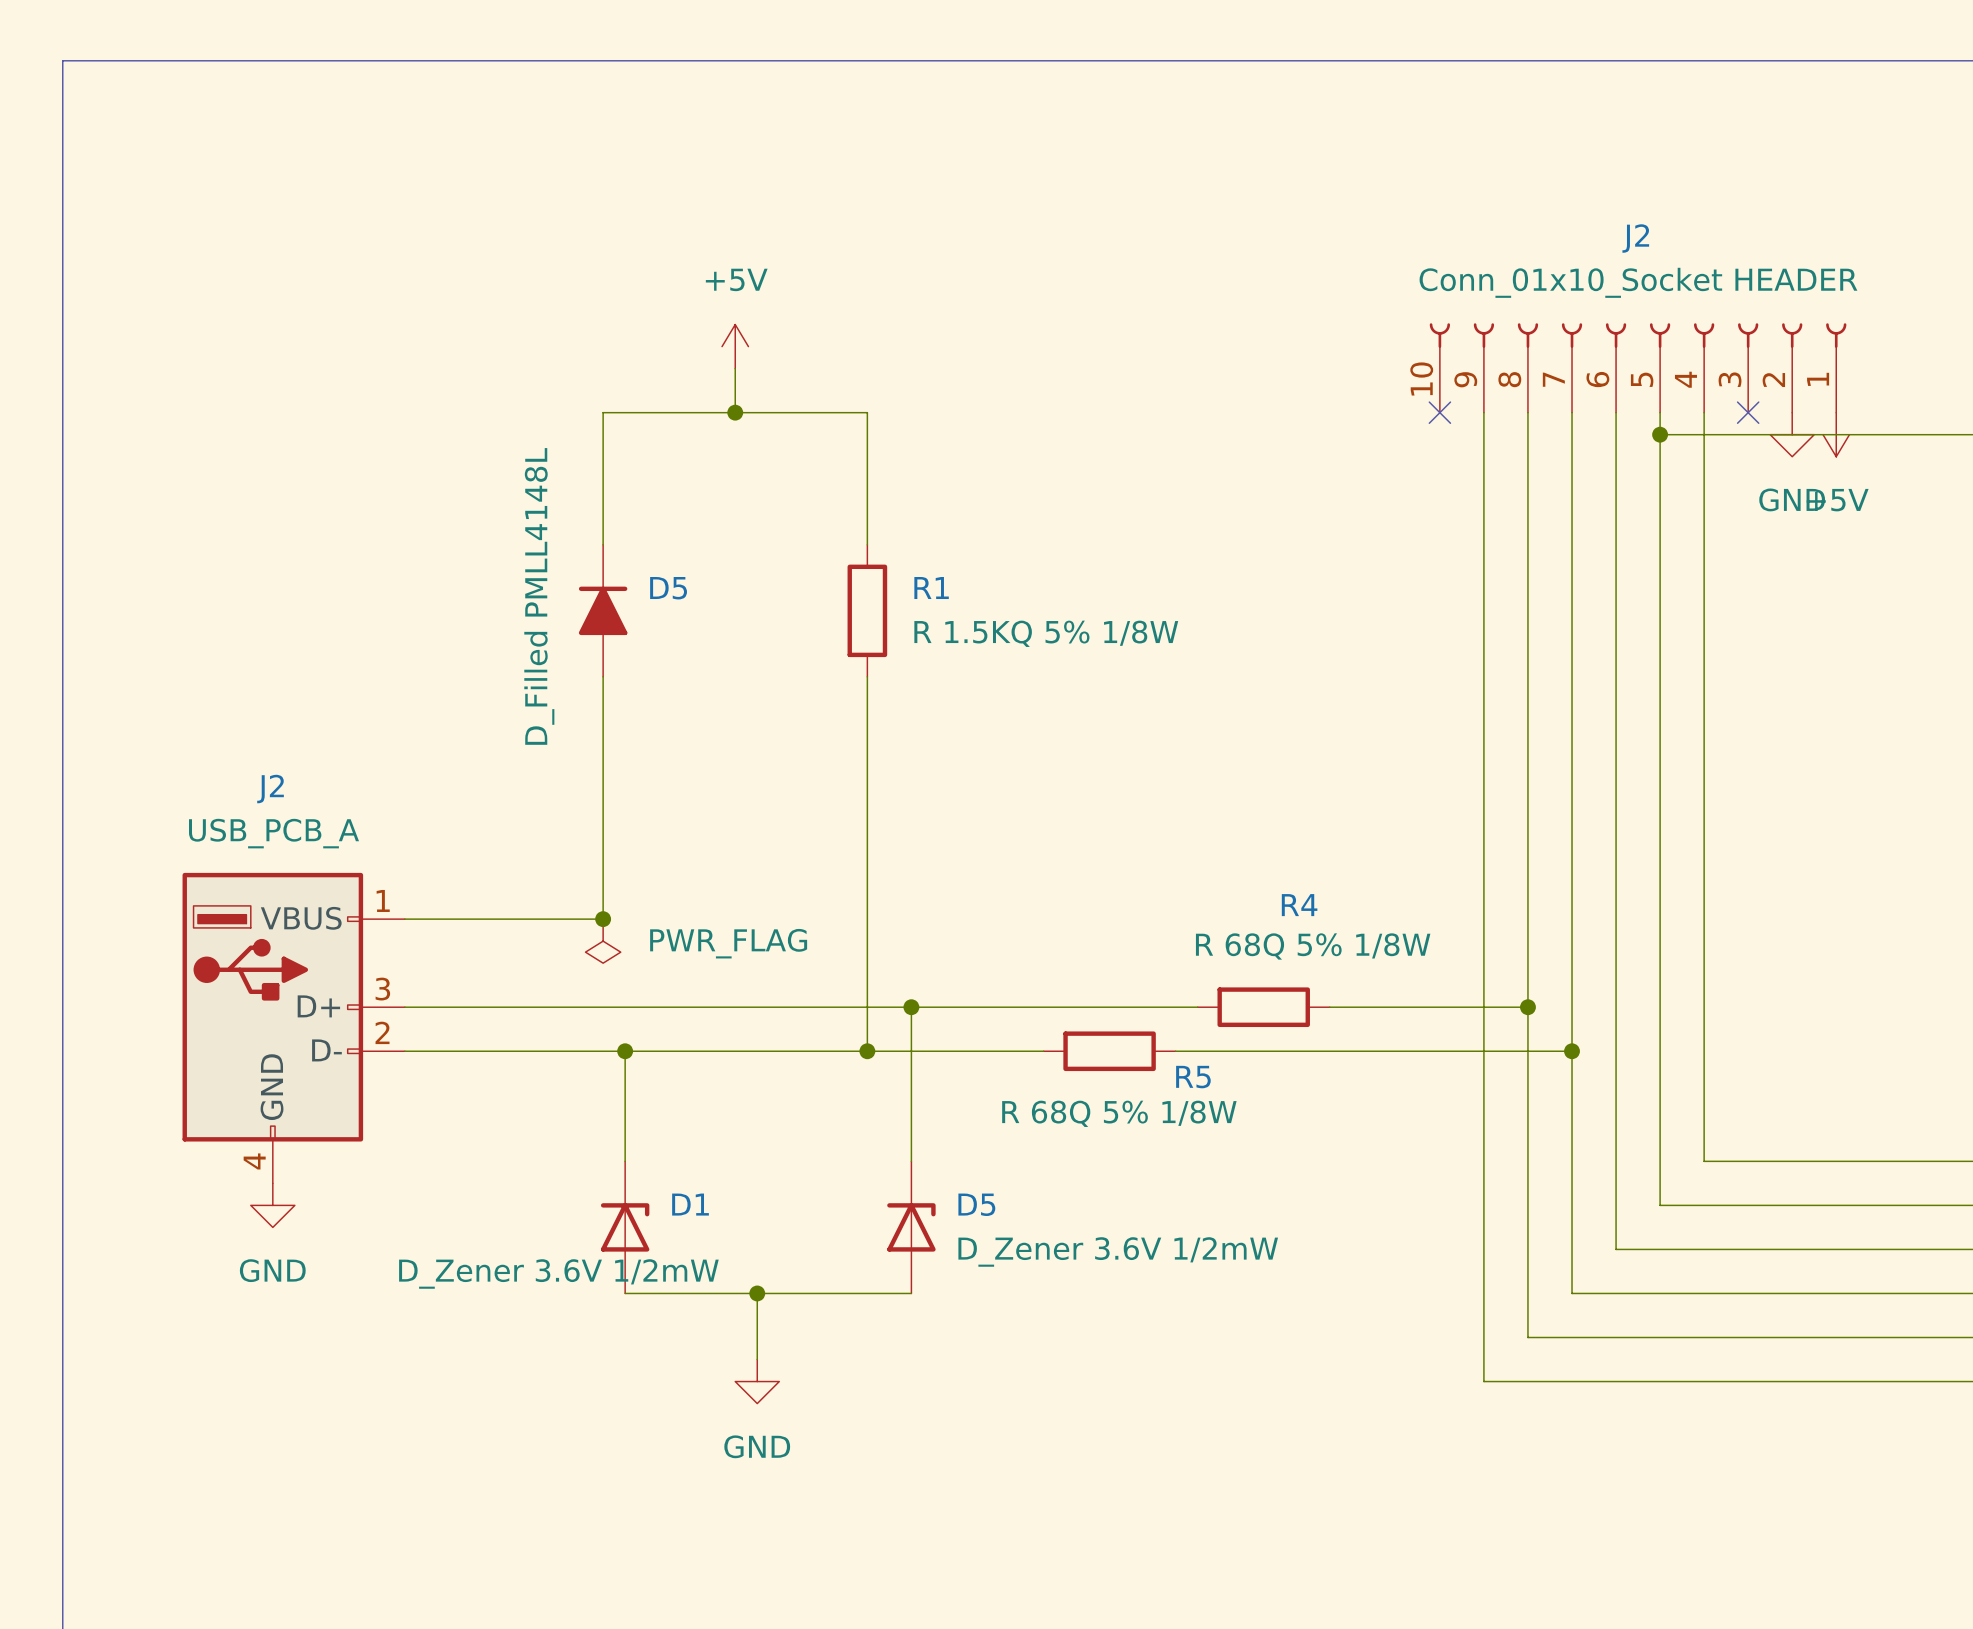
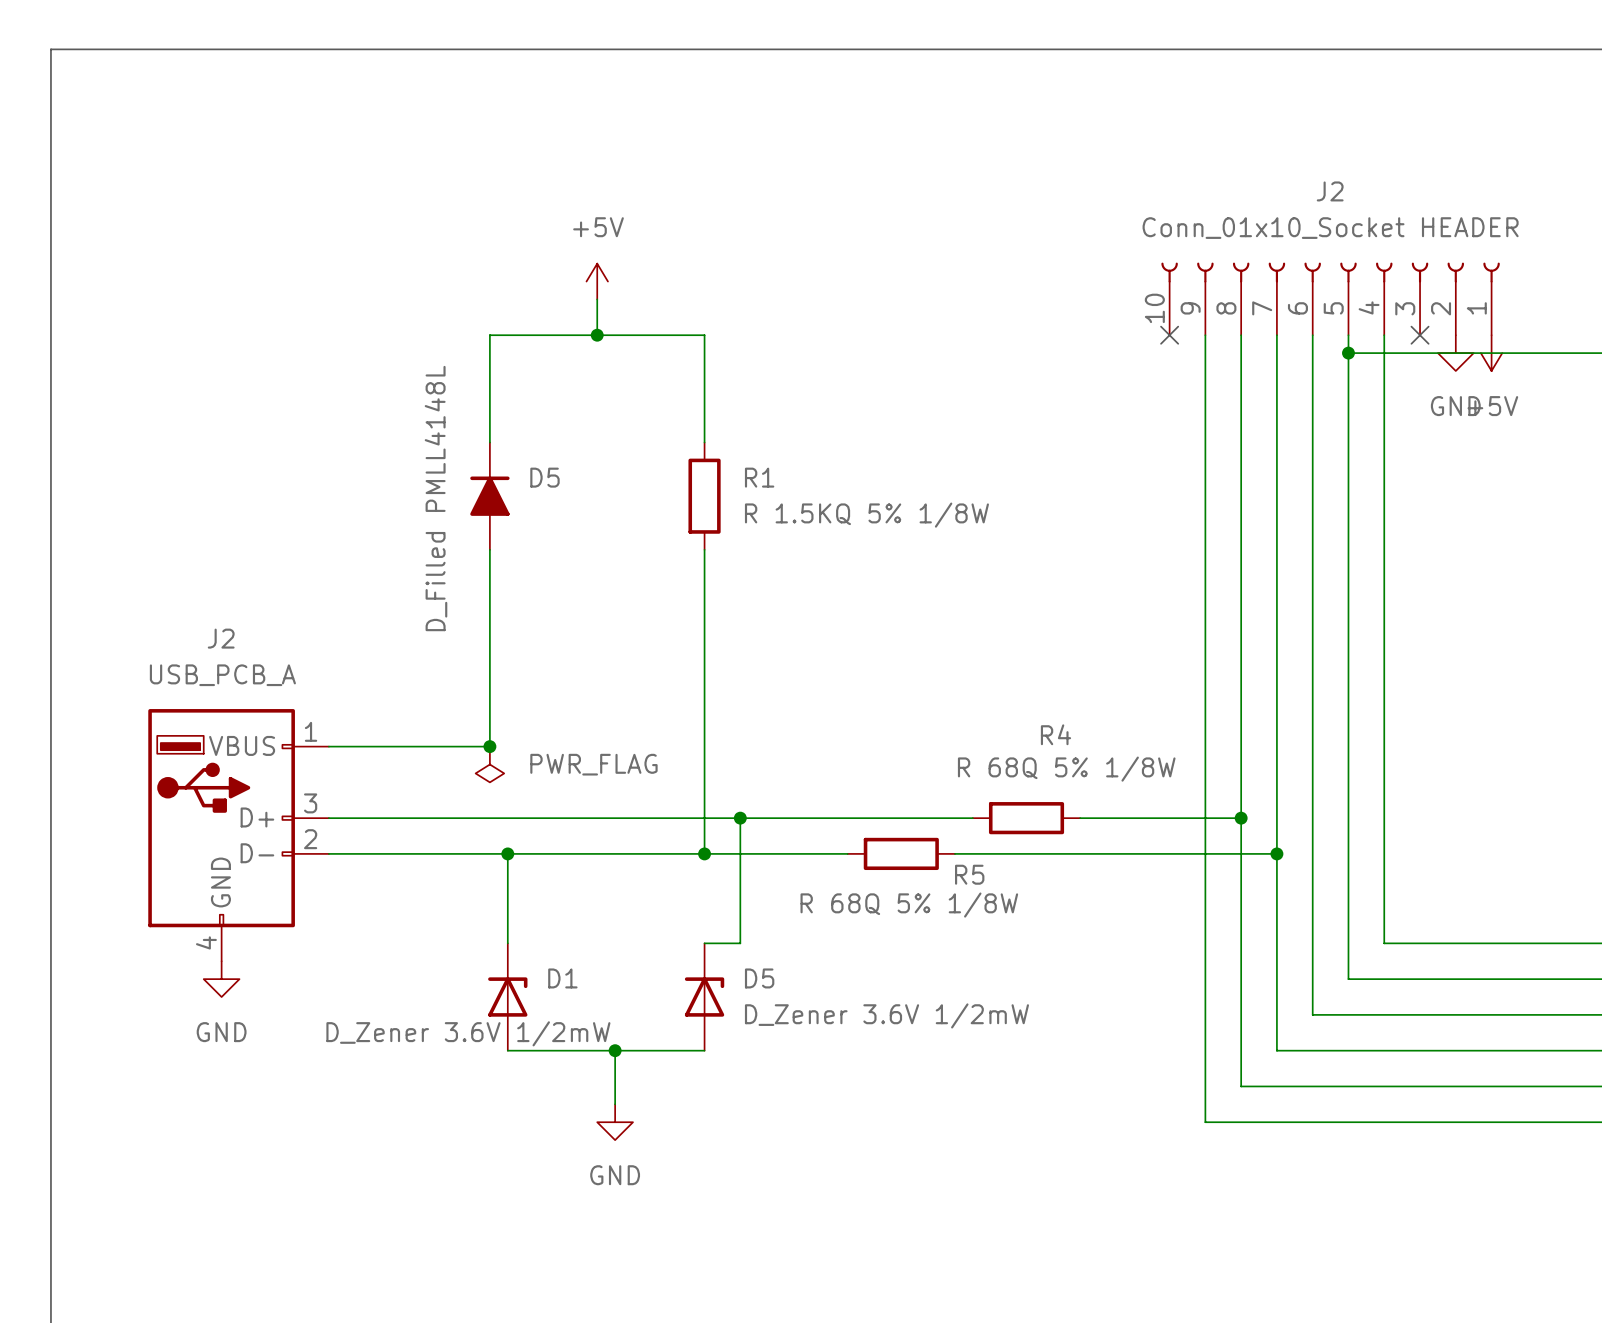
D5 position: (911, 1227) -> (704, 997)
wire: (867, 1293) (911, 1293) -> (704, 943) (740, 943)

